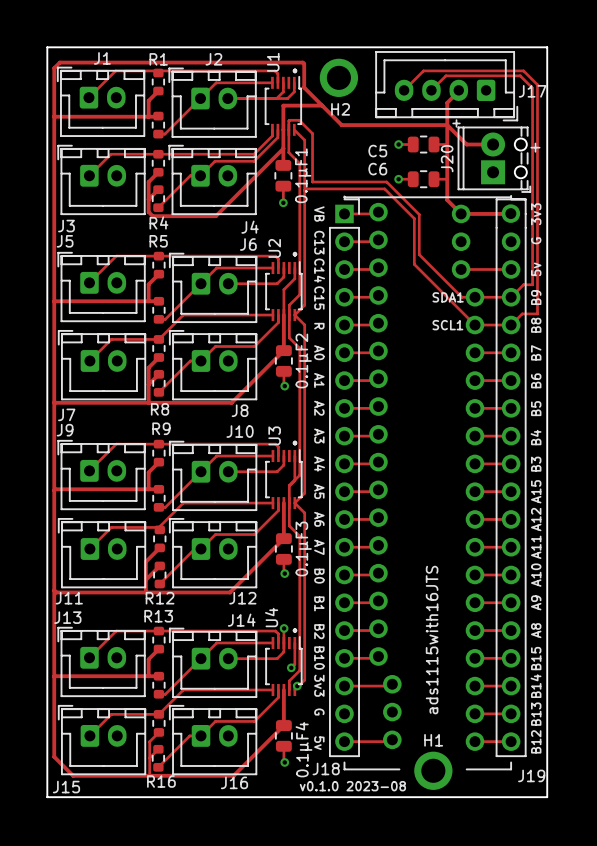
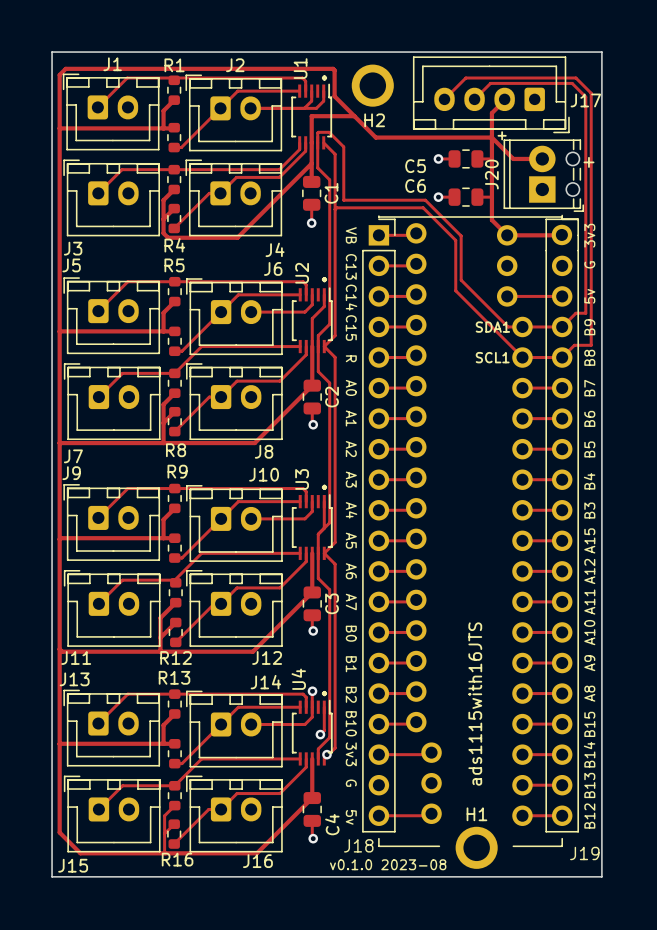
0.1µF1 name: 0.1µF1 (303, 175) -> C1 (331, 193)
0.1µF2 name: 0.1µF2 (303, 360) -> C2 (332, 397)
0.1µF3 name: 0.1µF3 (303, 549) -> C3 (332, 603)
0.1µF4 name: 0.1µF4 (303, 749) -> C4 (332, 824)

